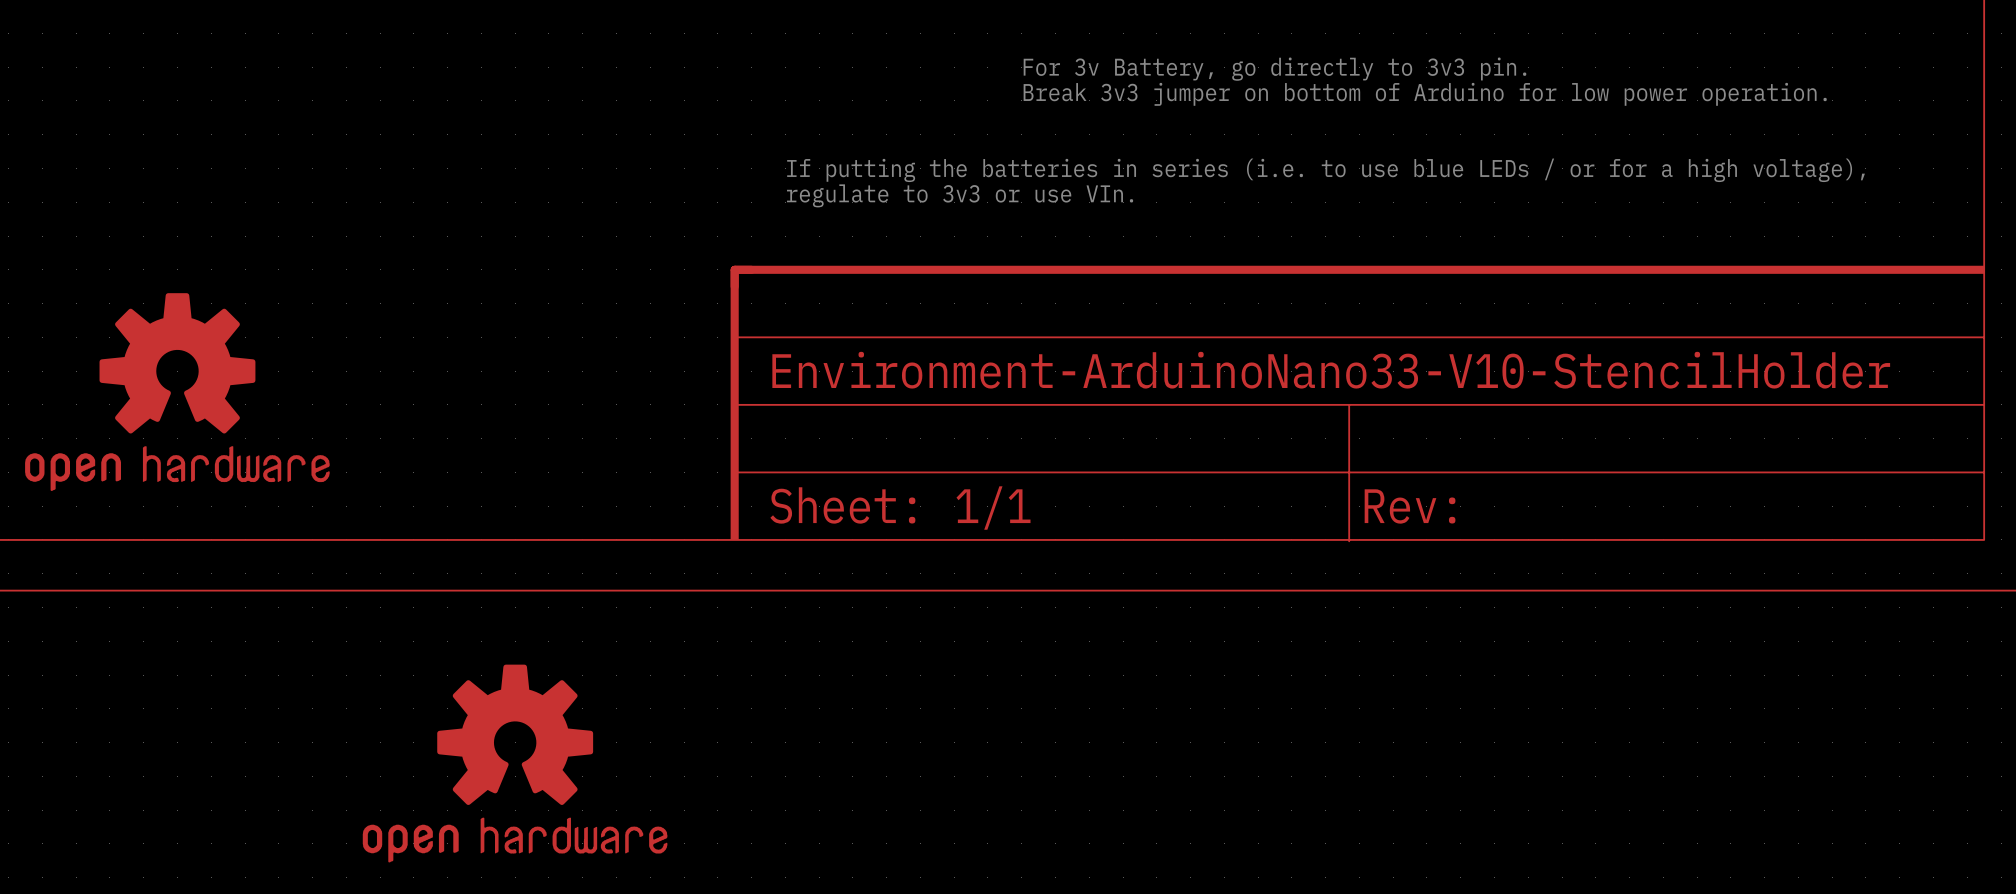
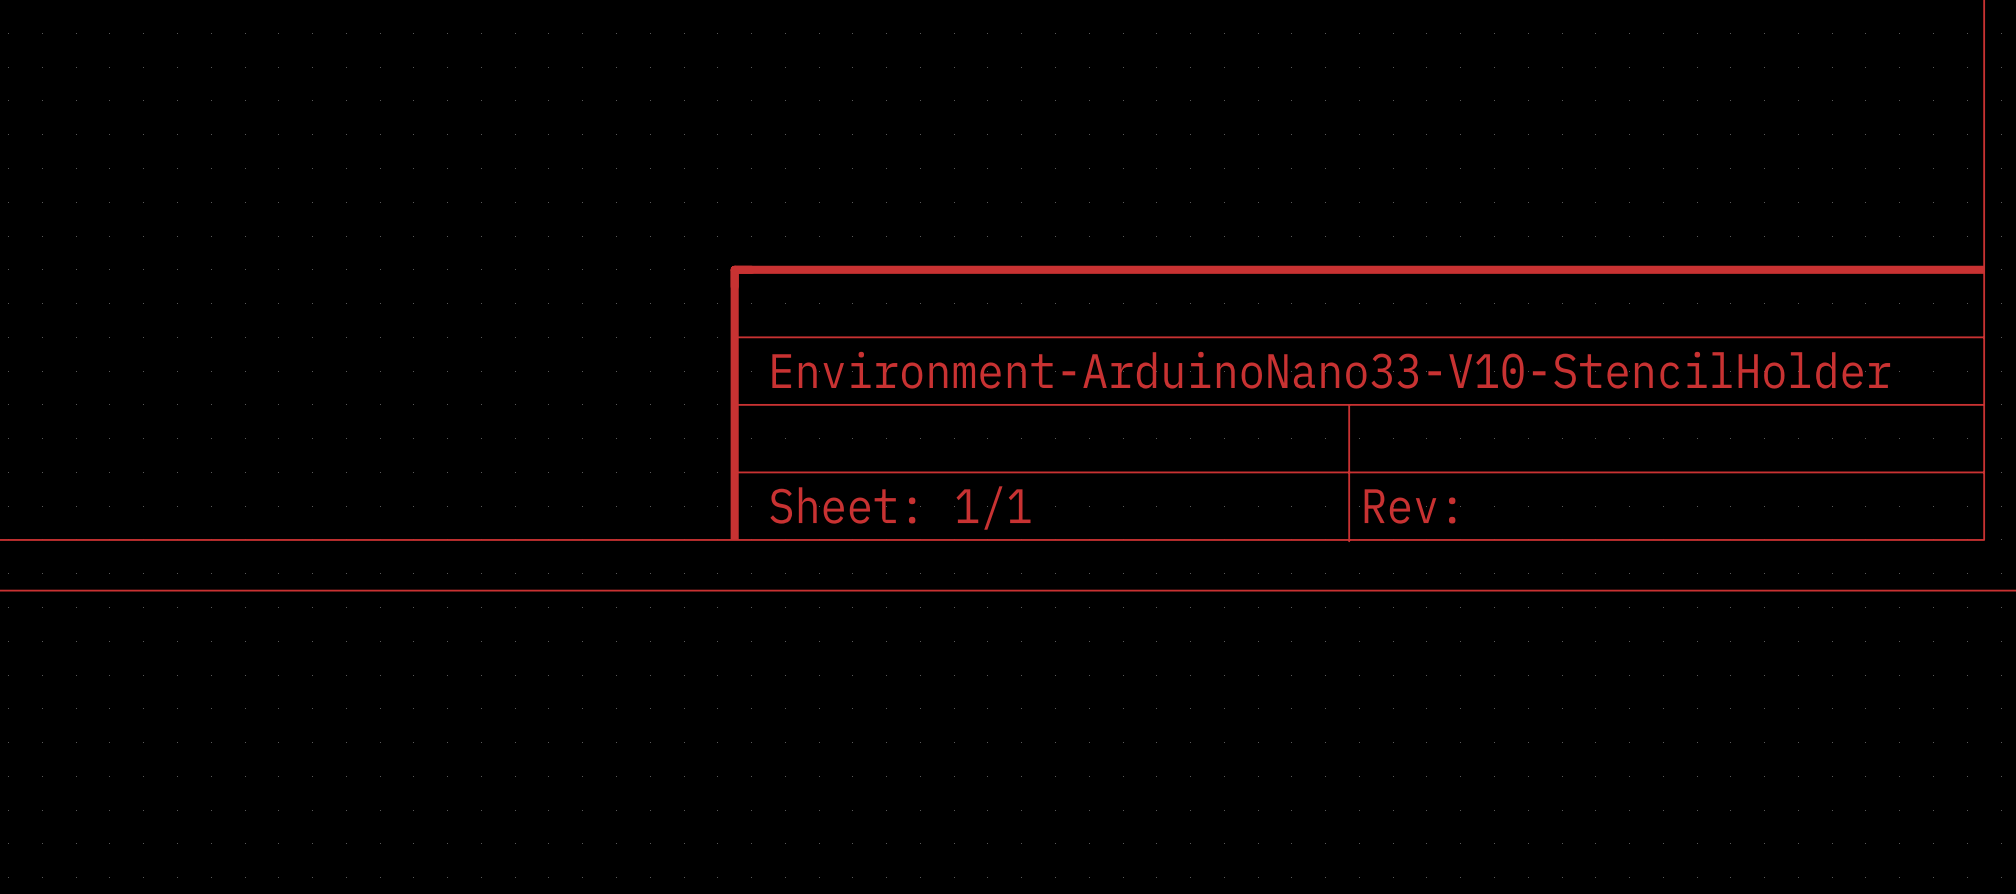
text: For 3v Battery, go directly to 3v3 pin. (1274, 69) -> none
text: Break 3v3 jumper on bottom of Arduino for low power operation. (1425, 94) -> none
text: If putting the batteries in series (i.e. to use blue LEDs / or for a high voltage), (1326, 170) -> none
text: regulate to 3v3 or use VIn. (960, 195) -> none
part: (177, 392) -> none
part: (515, 763) -> none

